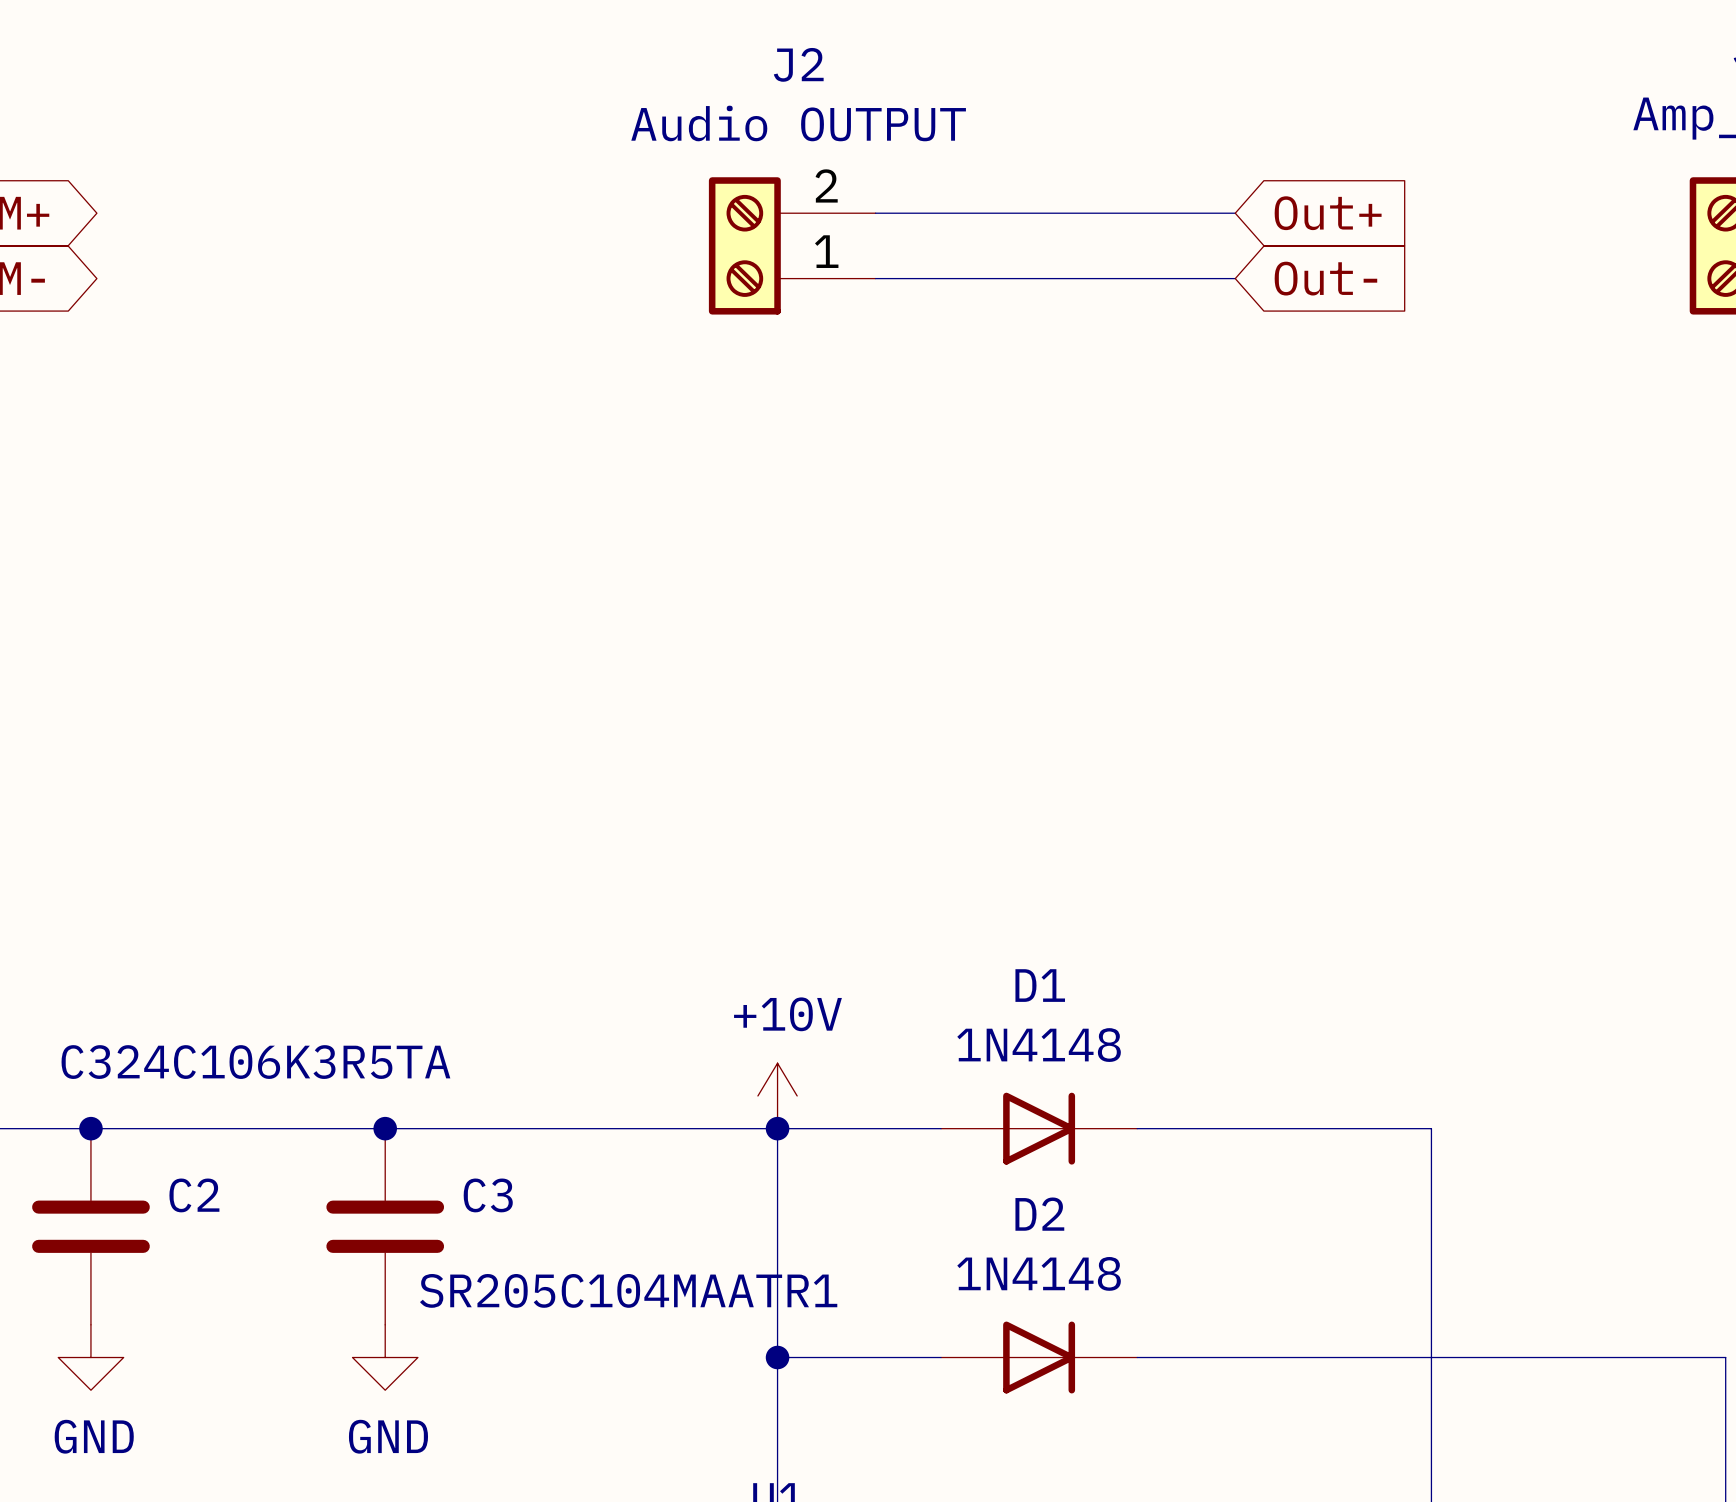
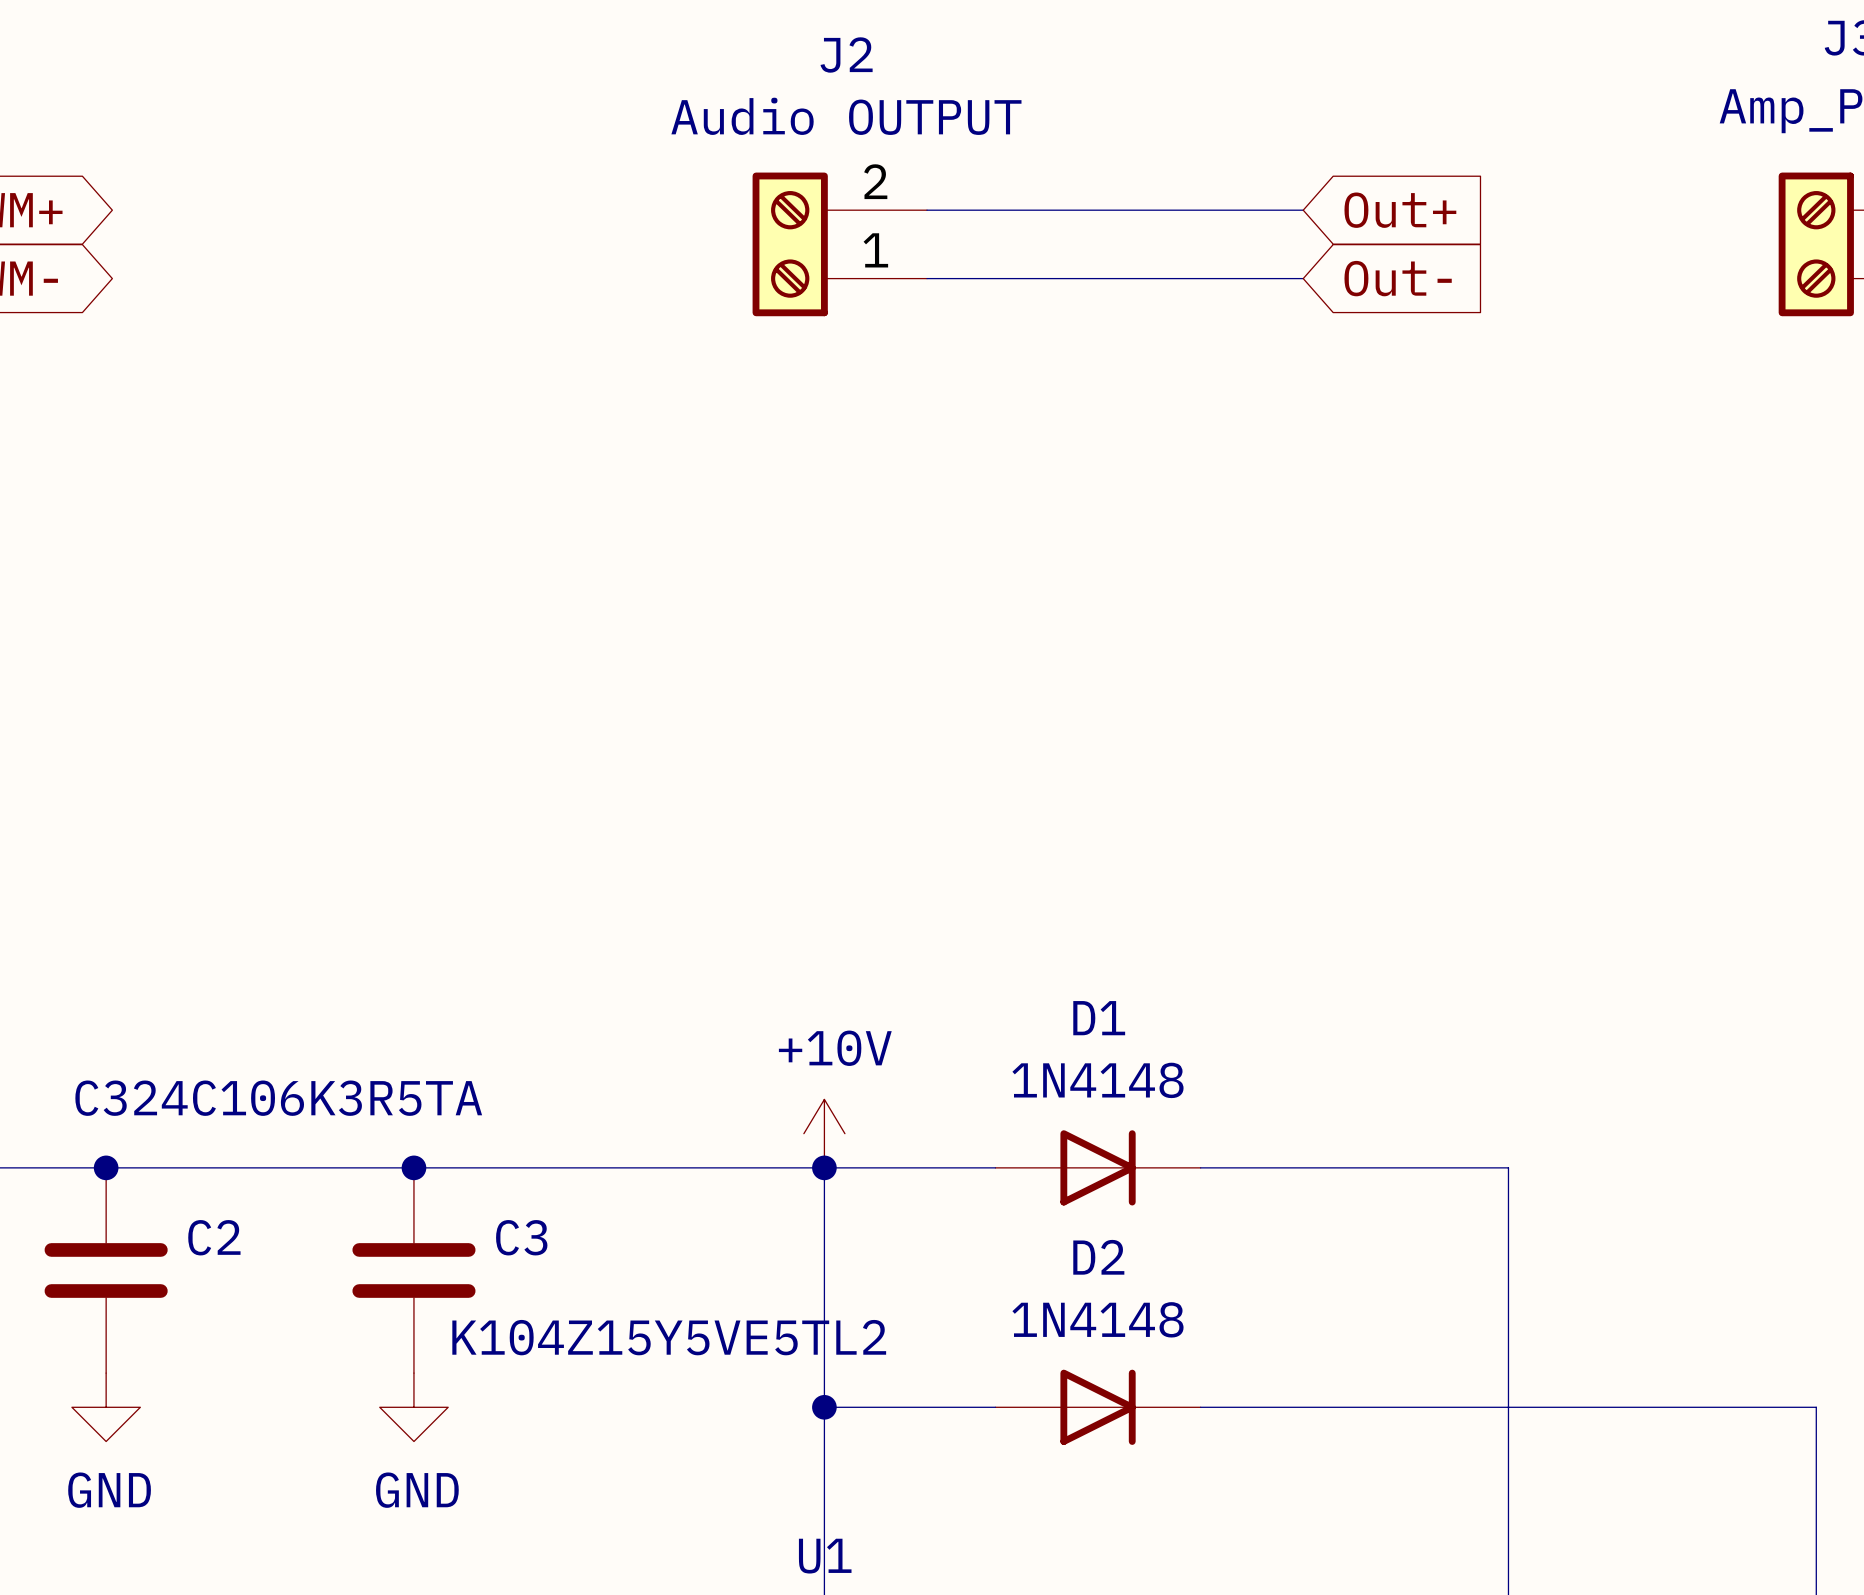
C3 value: SR205C104MAATR1 (628, 1290) -> K104Z15Y5VE5TL2 (669, 1337)

